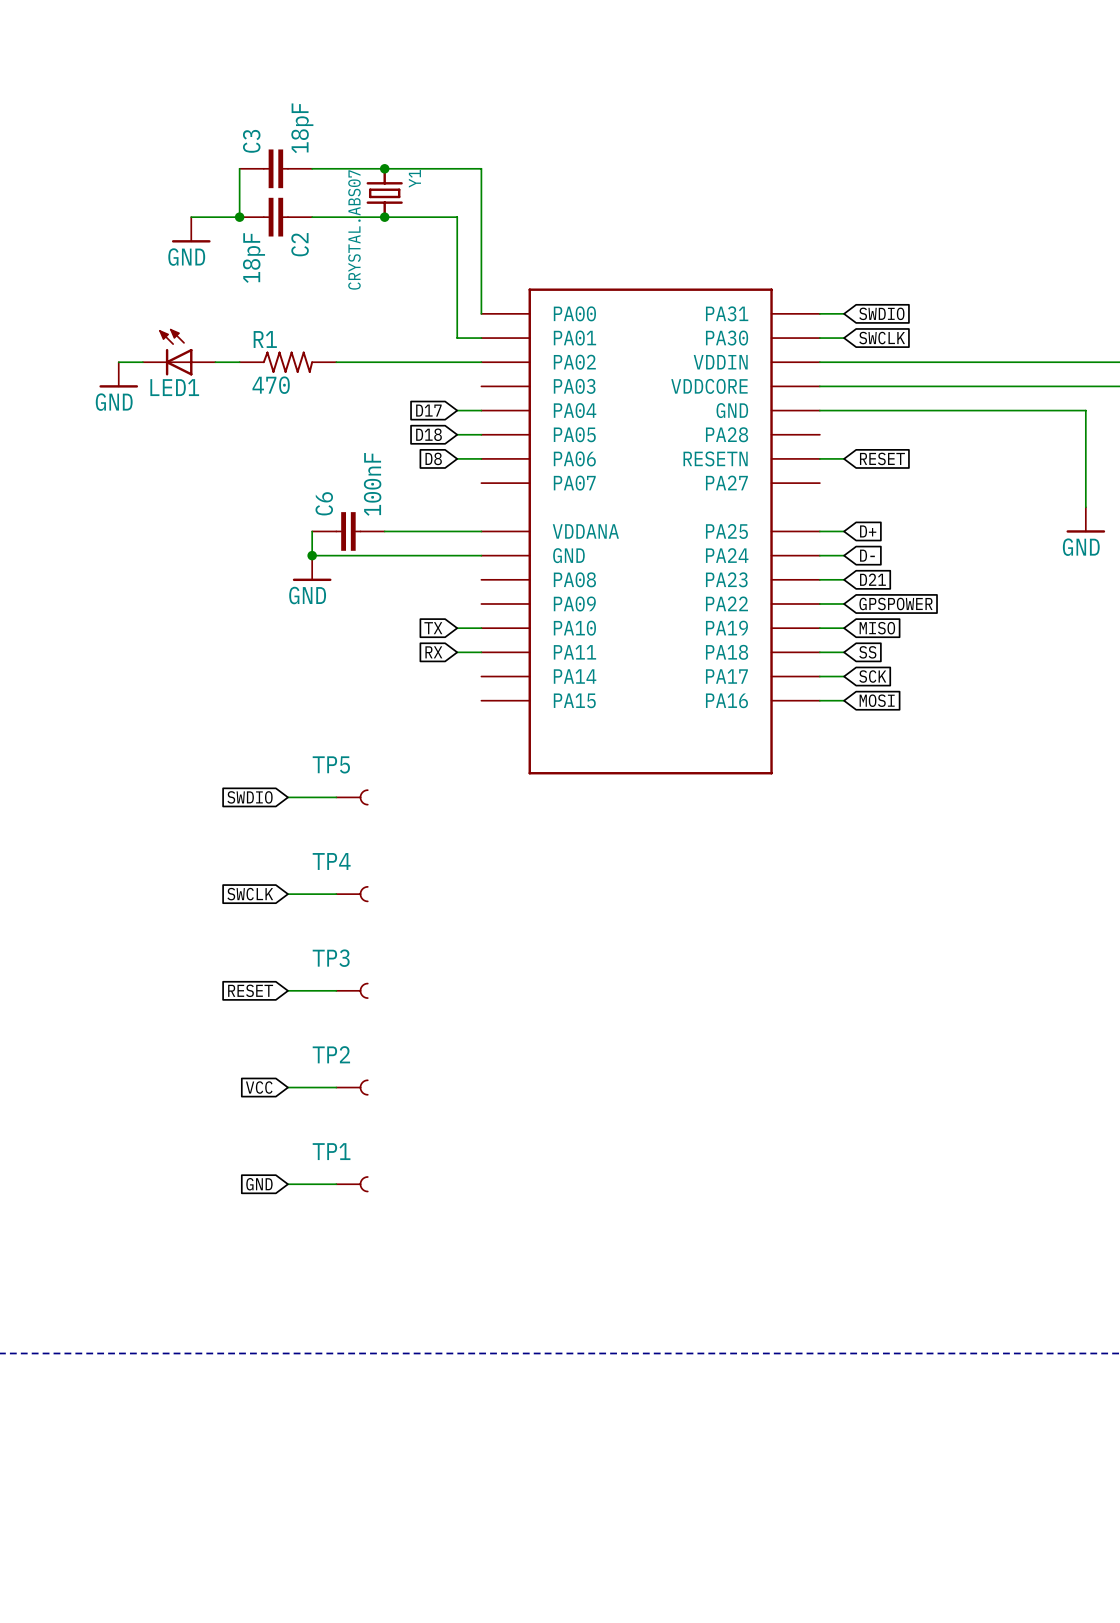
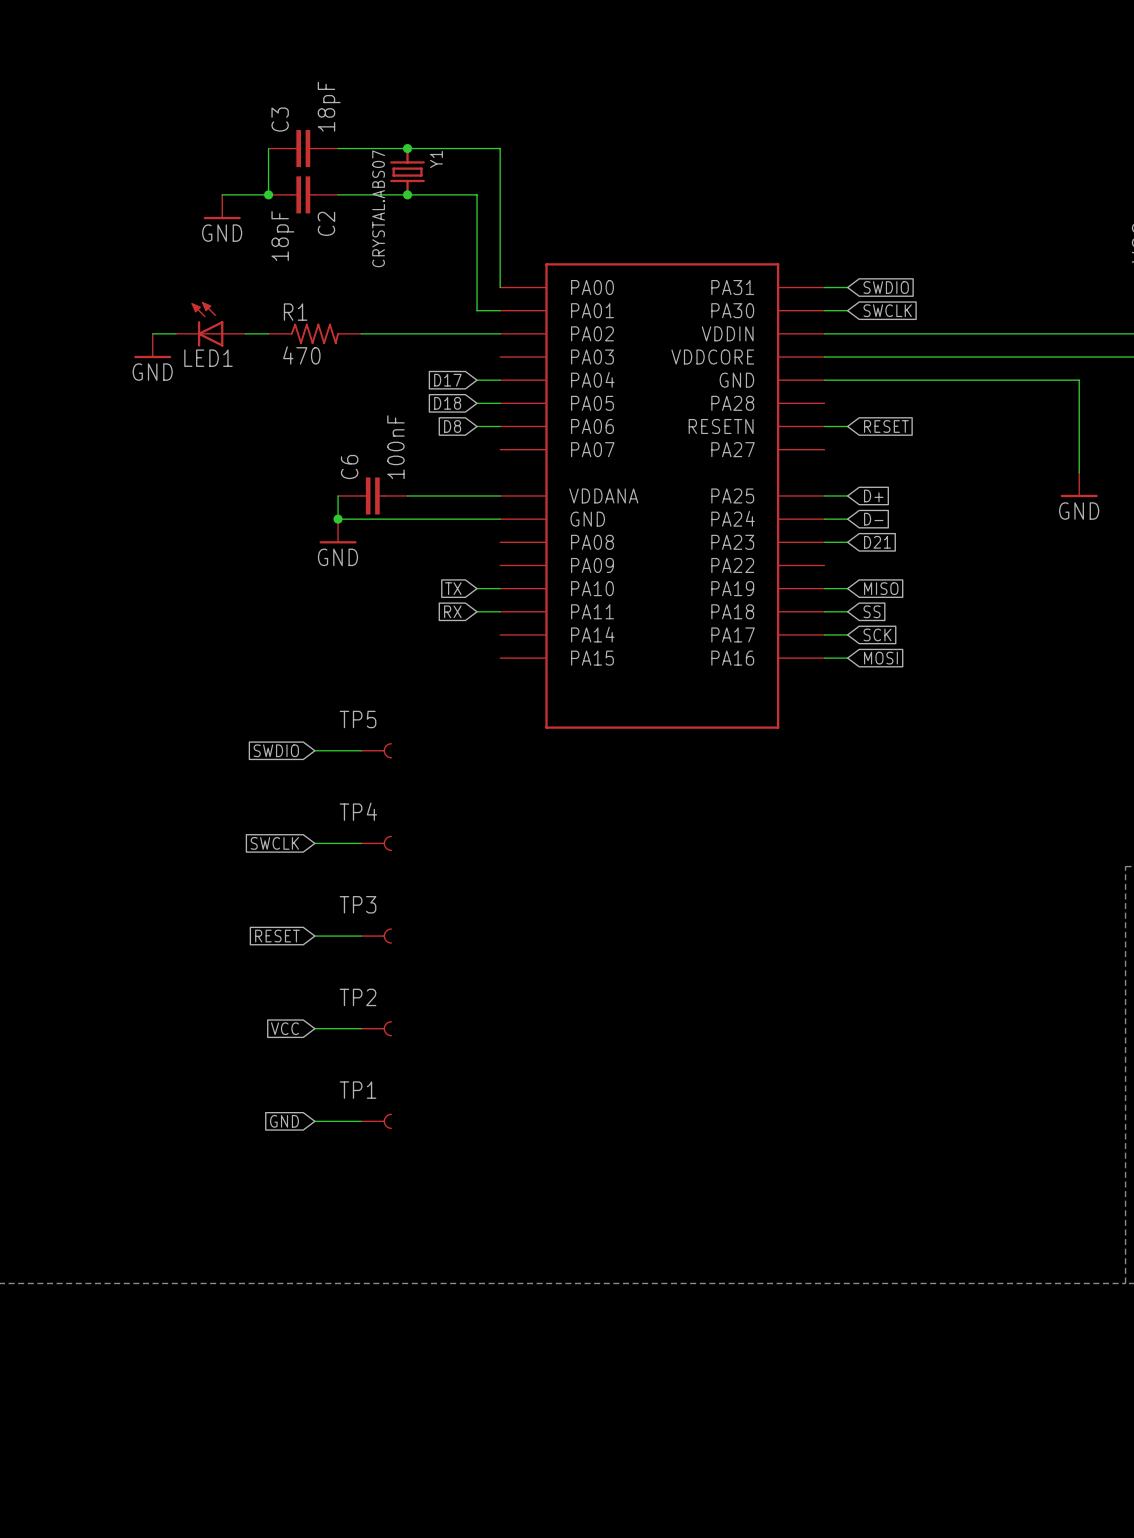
wire: (819, 603) (844, 603) -> none
global label: GPSPOWER (896, 603) -> none

